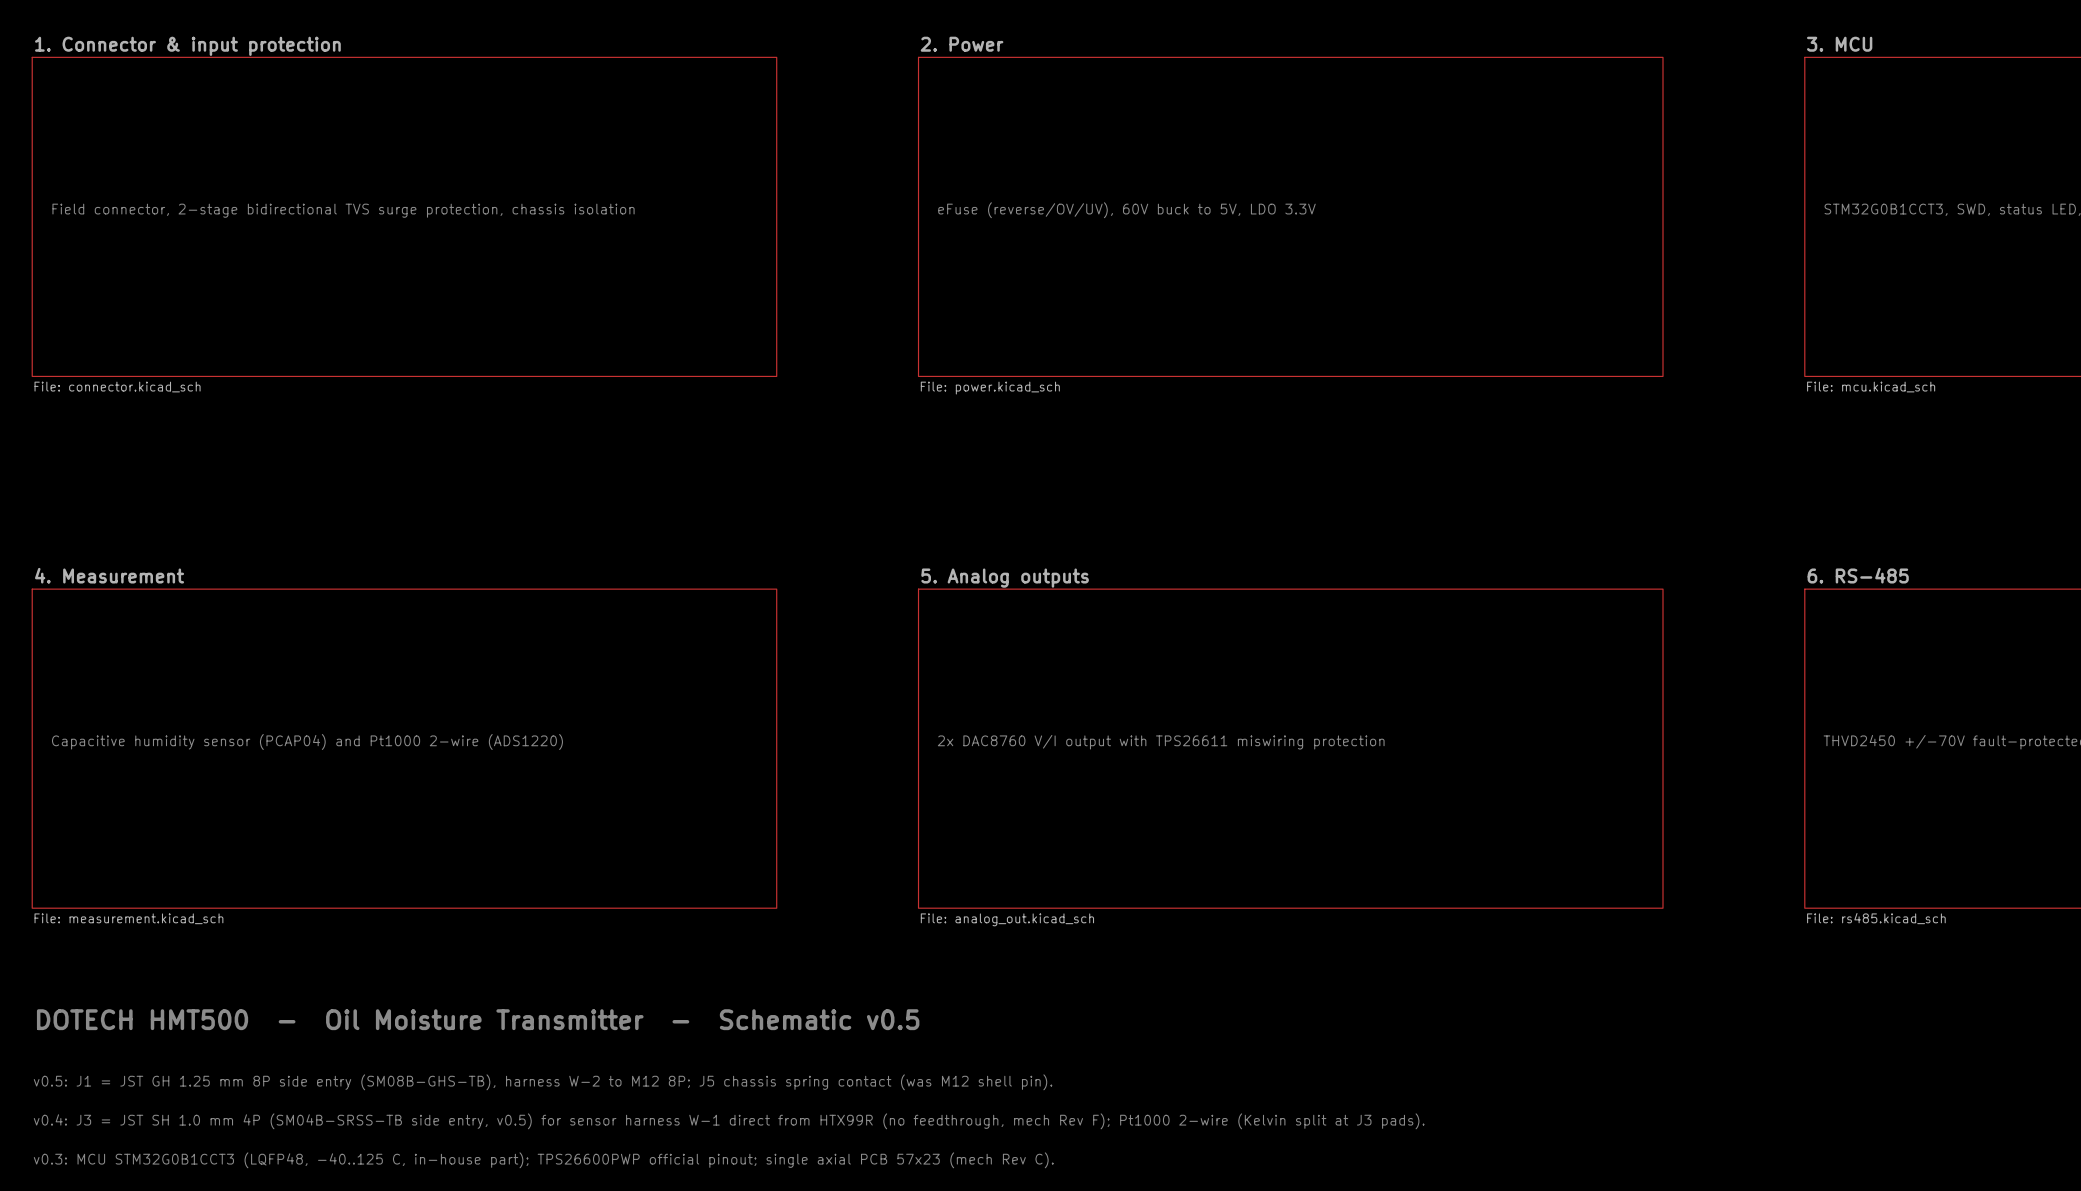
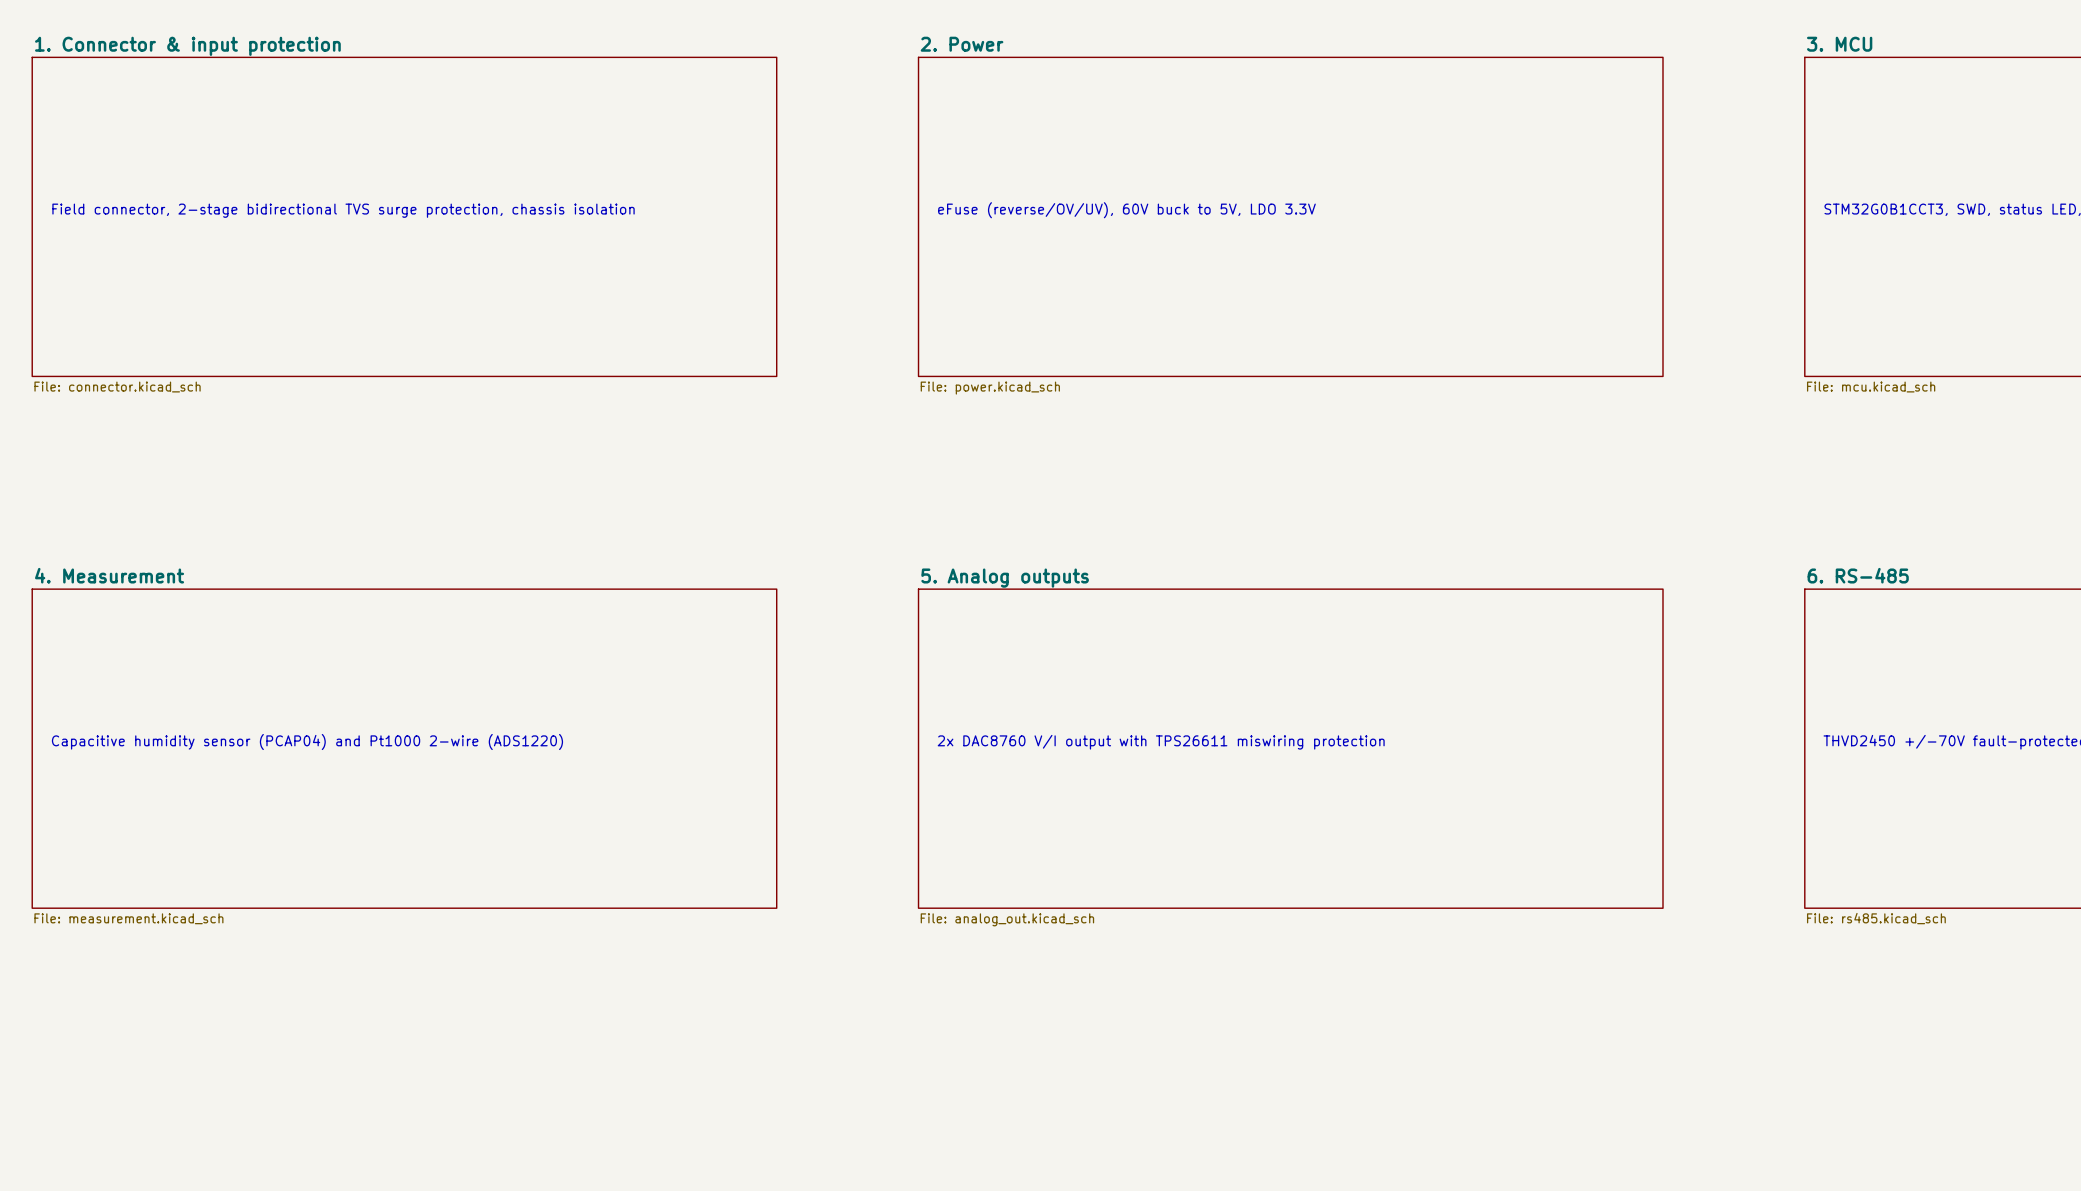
text: DOTECH HMT500 - Oil Moisture Transmitter - Schematic v0.5 (478, 1019) -> none
text: v0.5: J1 = JST GH 1.25 mm 8P side entry (SM08B-GHS-TB), harness W-2 to M12 8P; J5 chassis spring contact (was M12 shell pin). (543, 1082) -> none
text: v0.4: J3 = JST SH 1.0 mm 4P (SM04B-SRSS-TB side entry, v0.5) for sensor harness W-1 direct from HTX99R (no feedthrough, mech Rev F); Pt1000 2-wire (Kelvin split at J3 pads). (729, 1121) -> none
text: v0.3: MCU STM32G0B1CCT3 (LQFP48, -40..125 C, in-house part); TPS26600PWP official pinout; single axial PCB 57x23 (mech Rev C). (543, 1160) -> none

